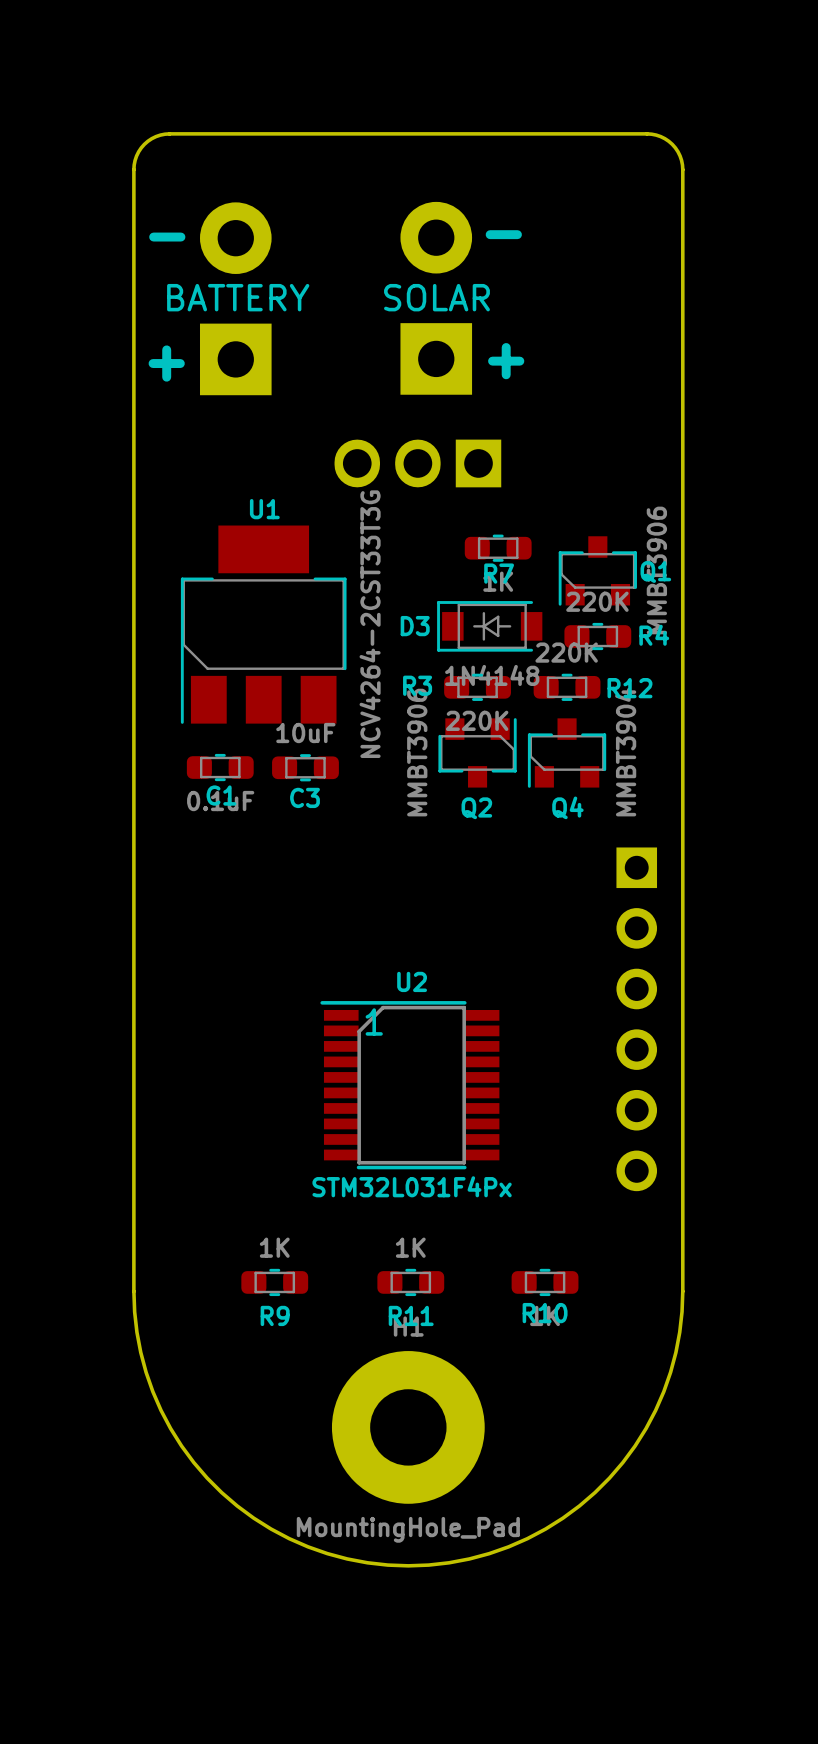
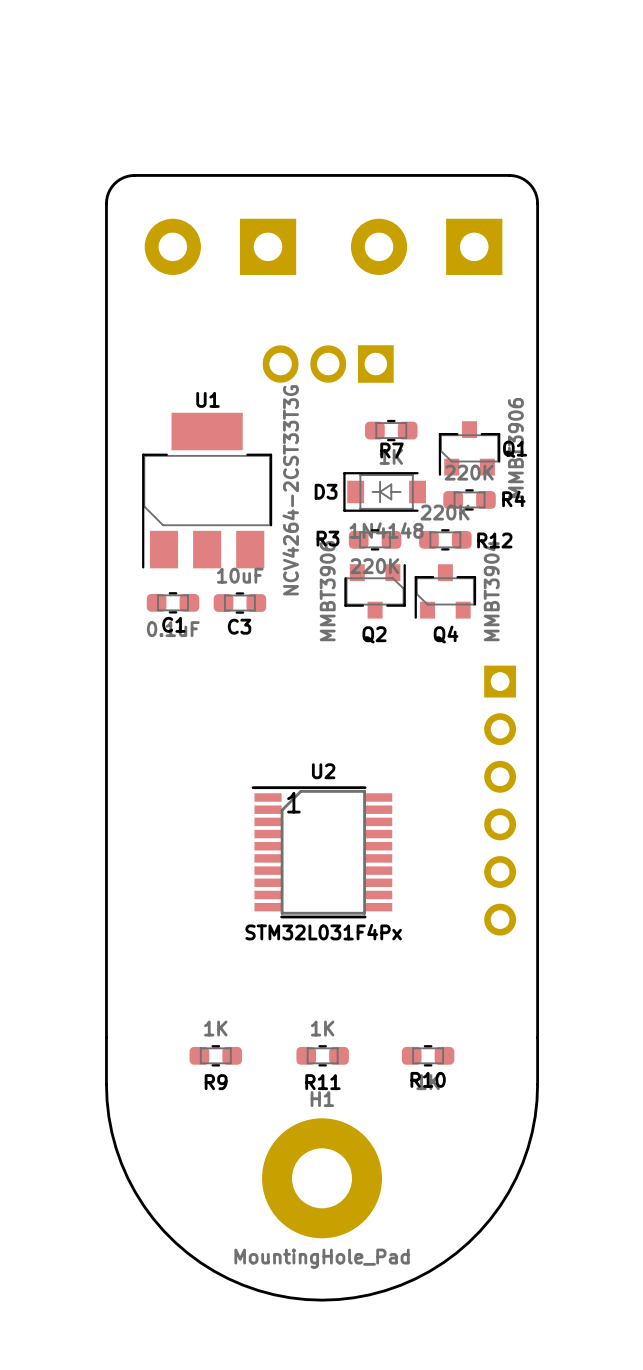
board edge: (169, 133) (647, 133) (656, 135) (668, 141) (678, 151) (681, 160) (682, 1291) (679, 1332) (670, 1372) (655, 1410) (635, 1445) (609, 1478) (579, 1505) (545, 1529) (508, 1546) (469, 1558) (449, 1562) (408, 1565) (367, 1562) (327, 1553) (289, 1538) (271, 1529) (237, 1505) (221, 1492) (193, 1462) (170, 1428) (161, 1410) (146, 1372) (140, 1352) (136, 1332) (133, 1291) (133, 169) (136, 155) (144, 144) (155, 136) (169, 133) -> (134, 175) (509, 175) (526, 181) (536, 196) (537, 1084) (535, 1116) (528, 1148) (516, 1178) (500, 1206) (480, 1231) (456, 1253) (429, 1271) (400, 1285) (370, 1294) (322, 1300) (274, 1294) (228, 1278) (200, 1262) (164, 1231) (143, 1206) (121, 1163) (111, 1132) (106, 1084) (106, 203) (108, 192) (114, 183) (123, 177) (134, 175)
text: - (503, 234) -> none
text: - (167, 237) -> none
text: BATTERY (238, 297) -> none
text: SOLAR (436, 297) -> none
part rotation: 0° (235, 298) -> 90° counterclockwise (220, 246)
part: (436, 298) -> none
part: none -> (426, 246)
text: + (506, 361) -> none
text: + (166, 363) -> none
R9 position: (274, 1282) -> (215, 1055)
R11 position: (410, 1282) -> (322, 1055)
R10 position: (545, 1282) -> (428, 1055)
H1 position: (408, 1427) -> (322, 1178)

